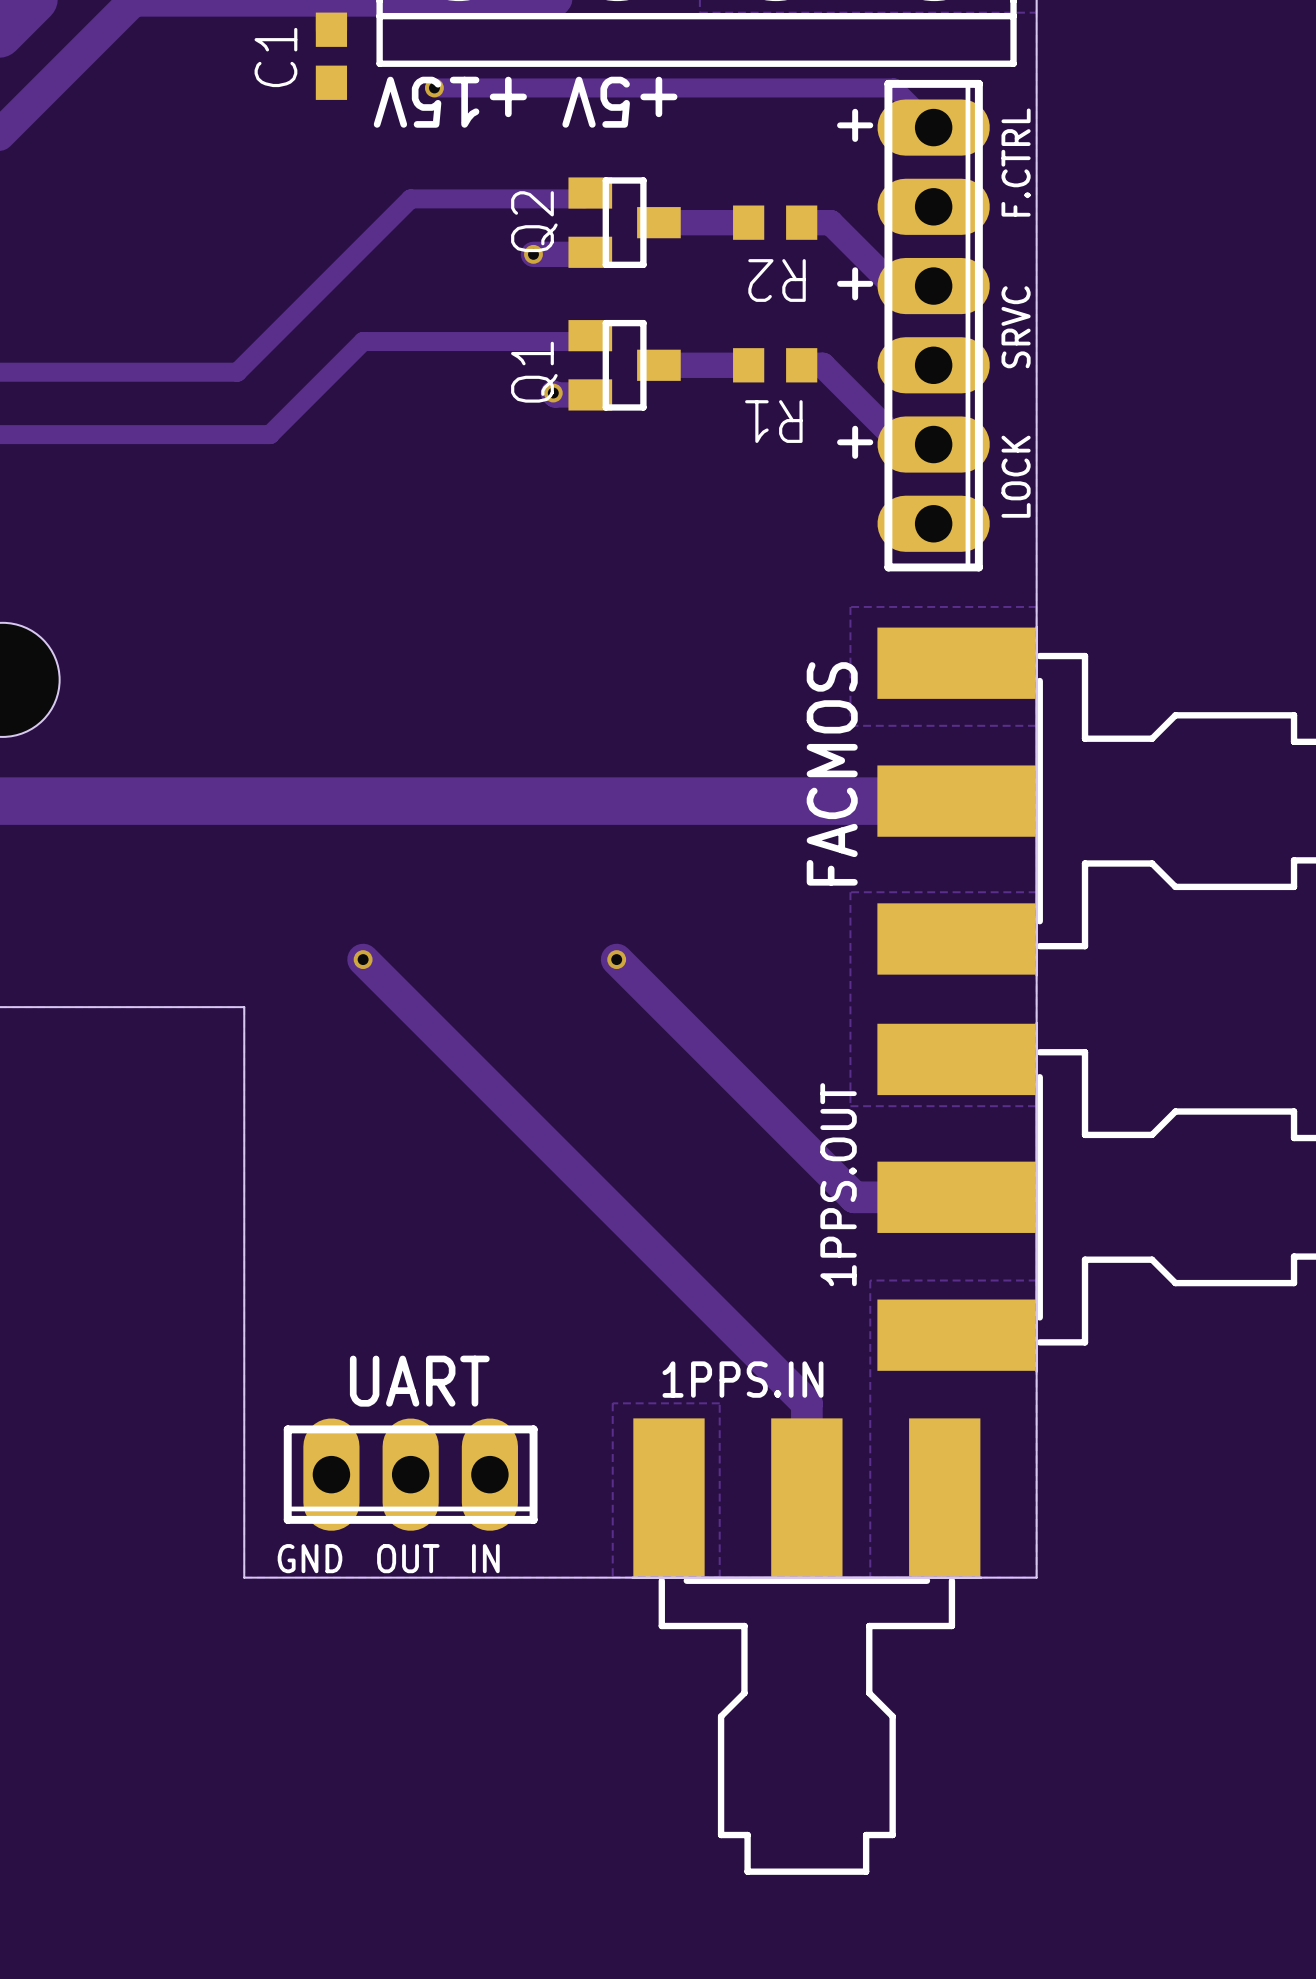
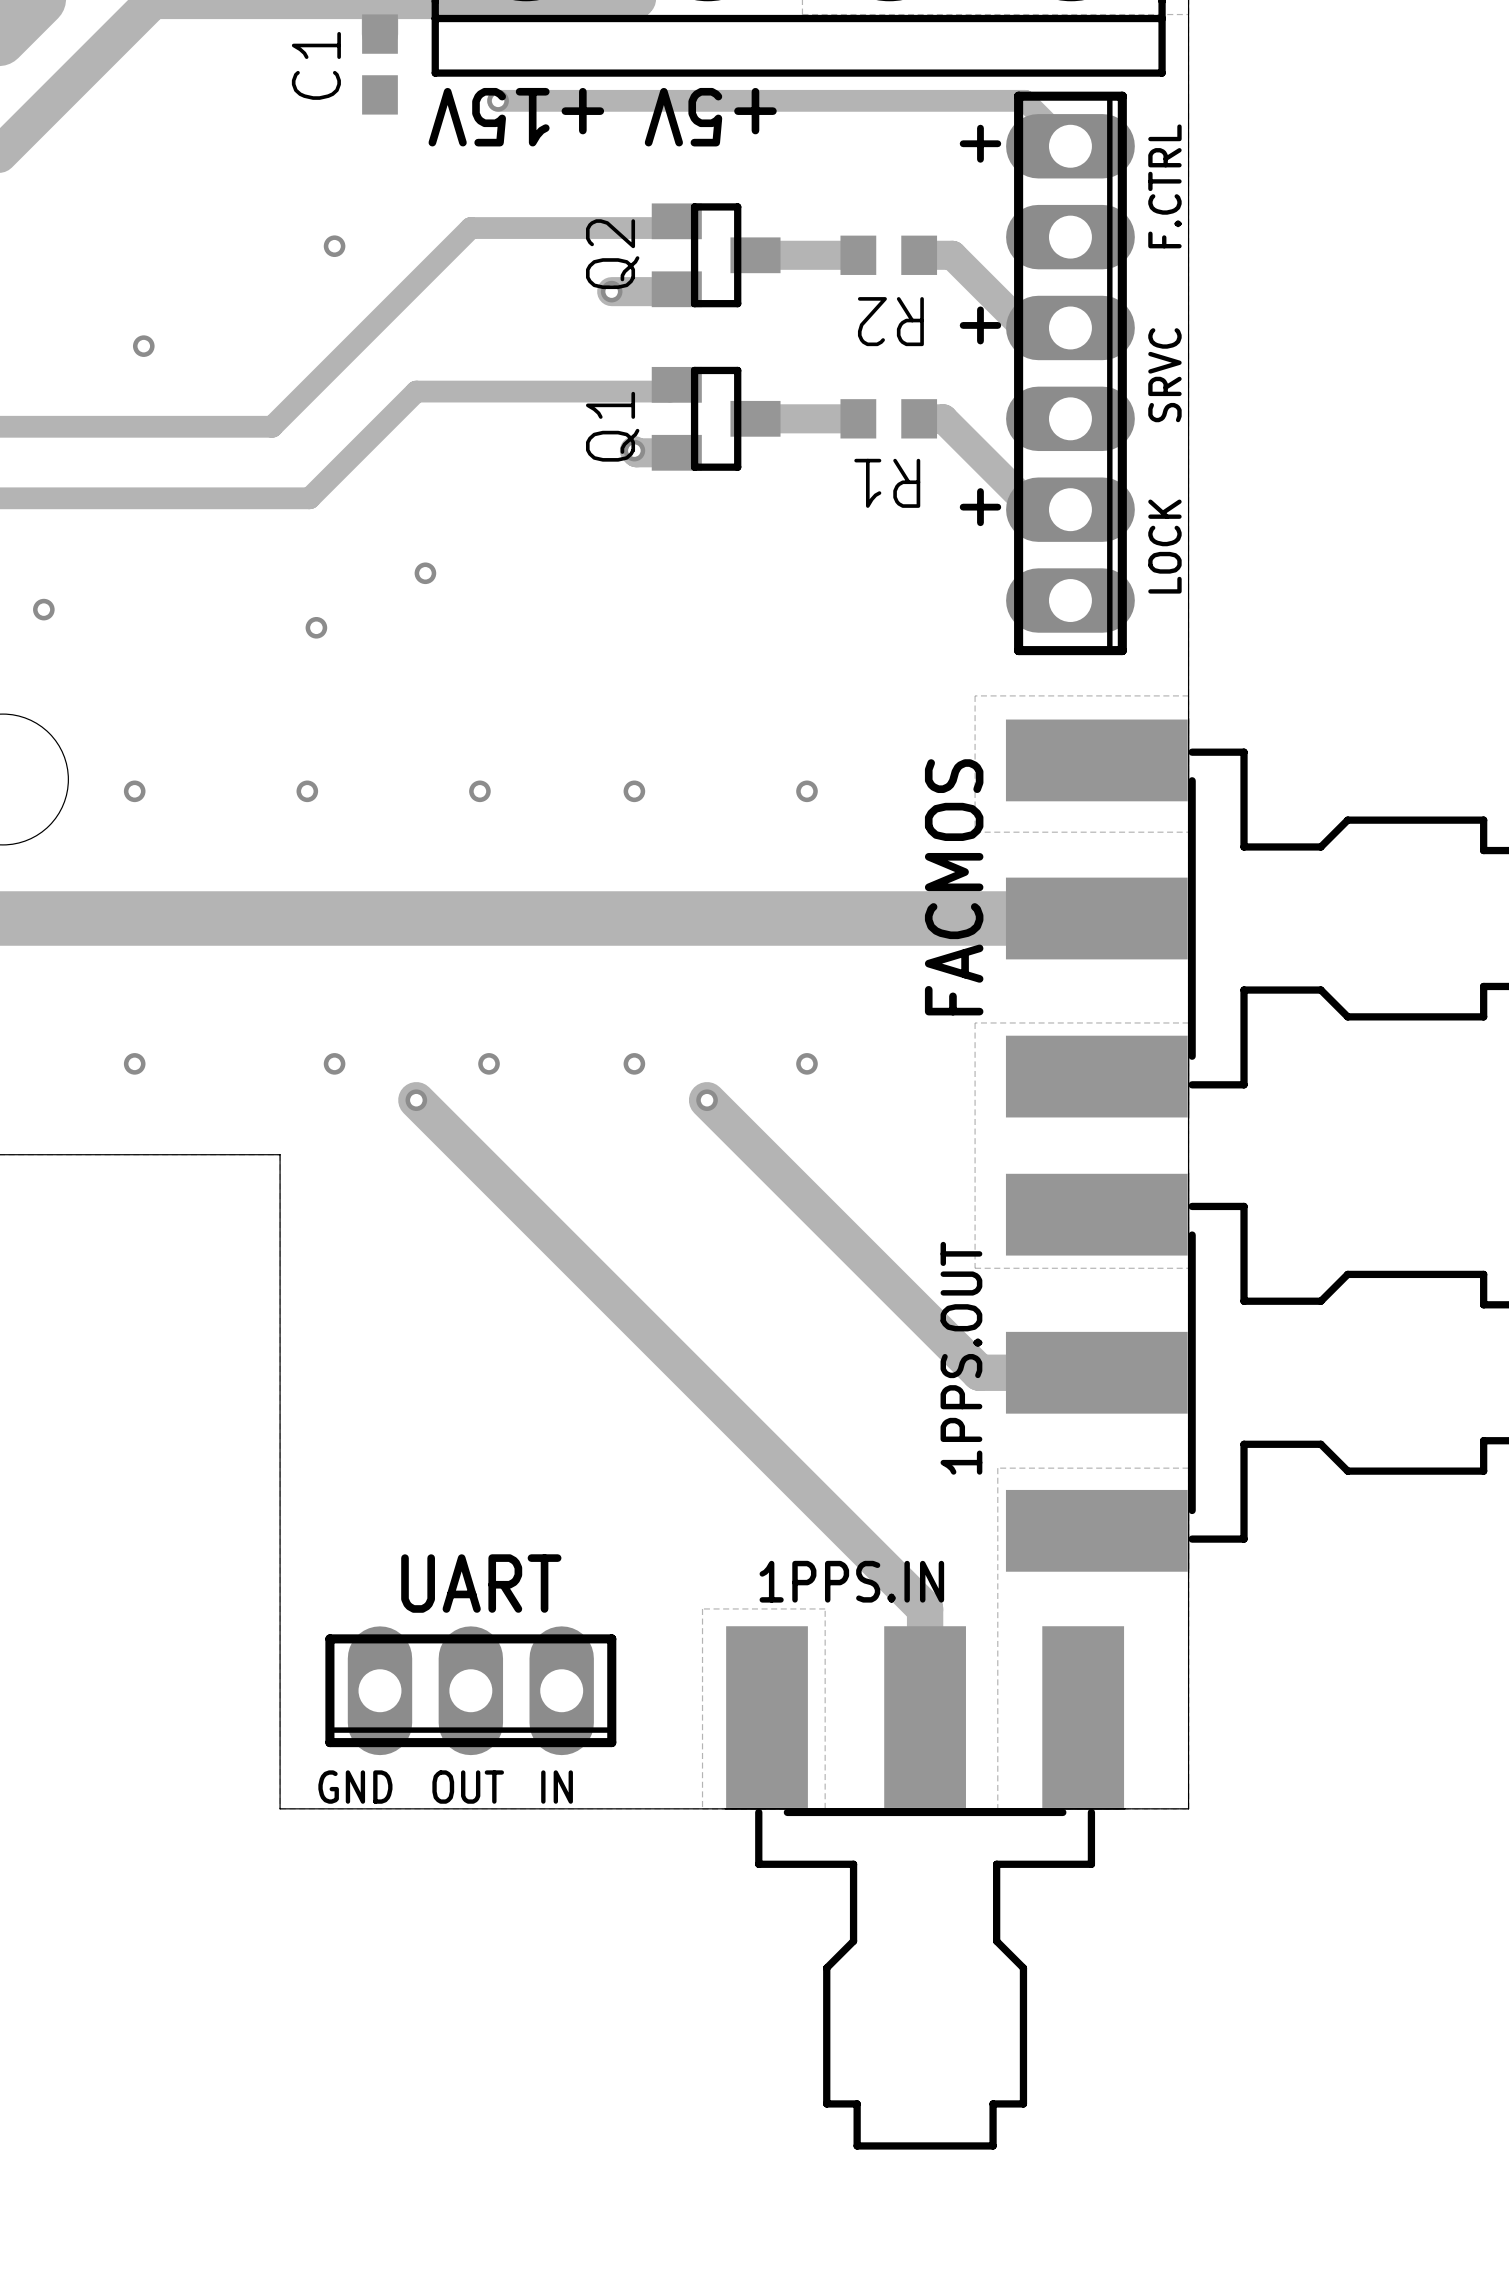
via: none -> (334, 246)
via: none -> (143, 346)
via: none -> (425, 573)
via: none -> (43, 609)
via: none -> (316, 627)
via: none -> (134, 791)
via: none -> (307, 791)
via: none -> (479, 791)
via: none -> (634, 791)
via: none -> (806, 791)
via: none -> (134, 1063)
via: none -> (334, 1063)
via: none -> (489, 1063)
via: none -> (634, 1063)
via: none -> (806, 1063)

